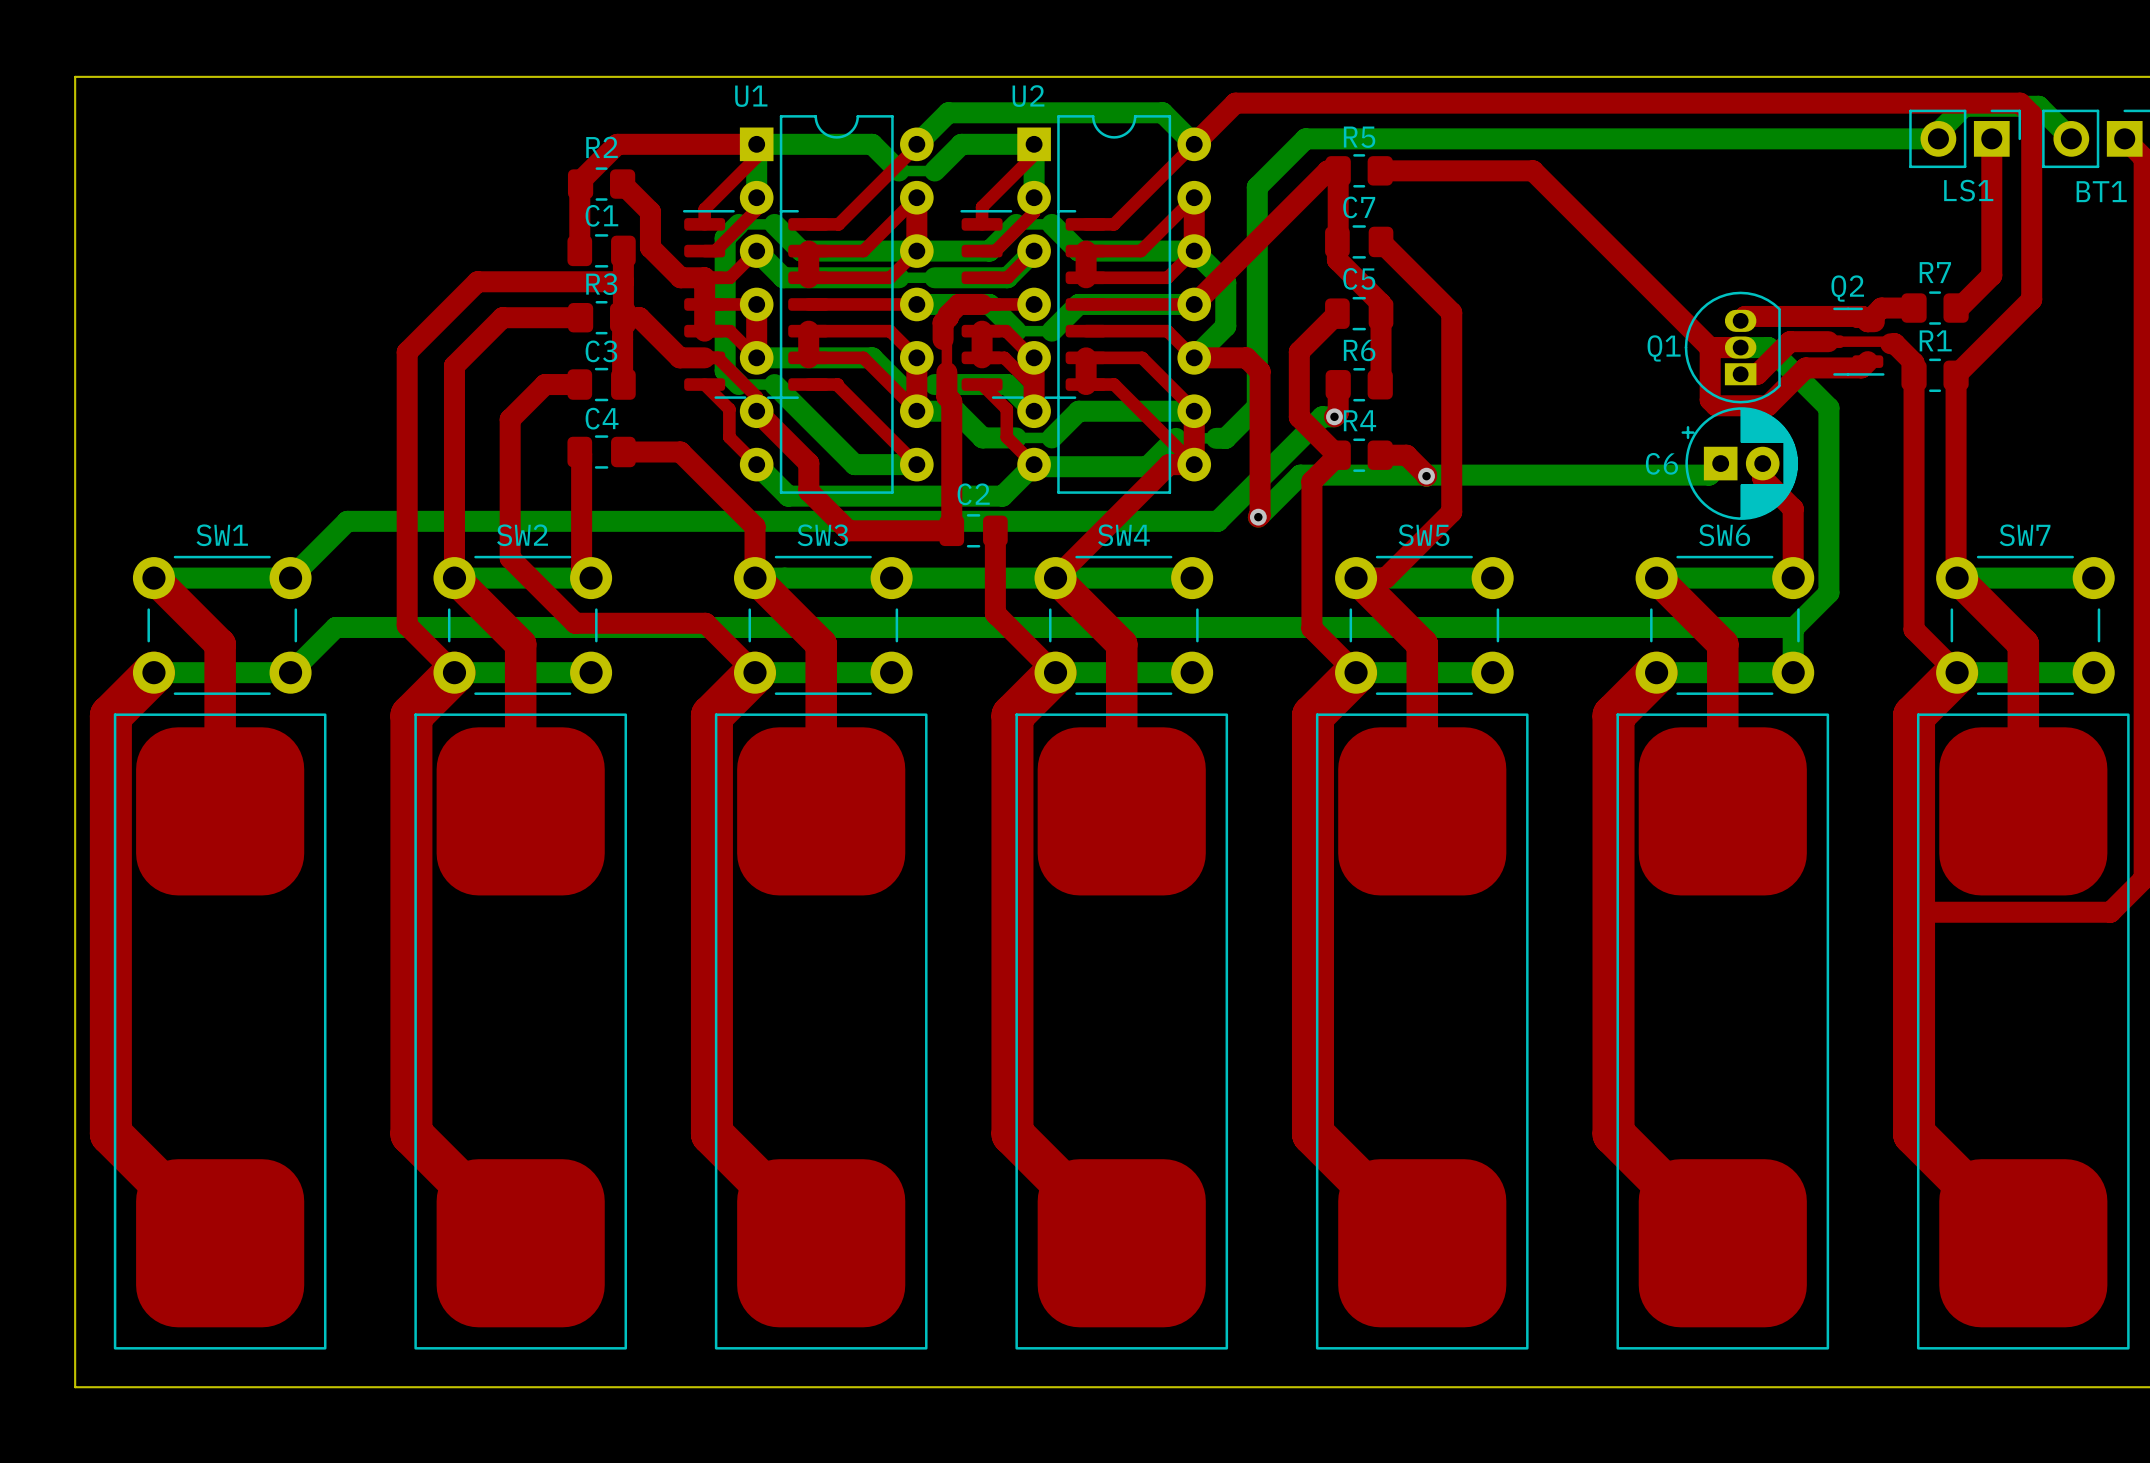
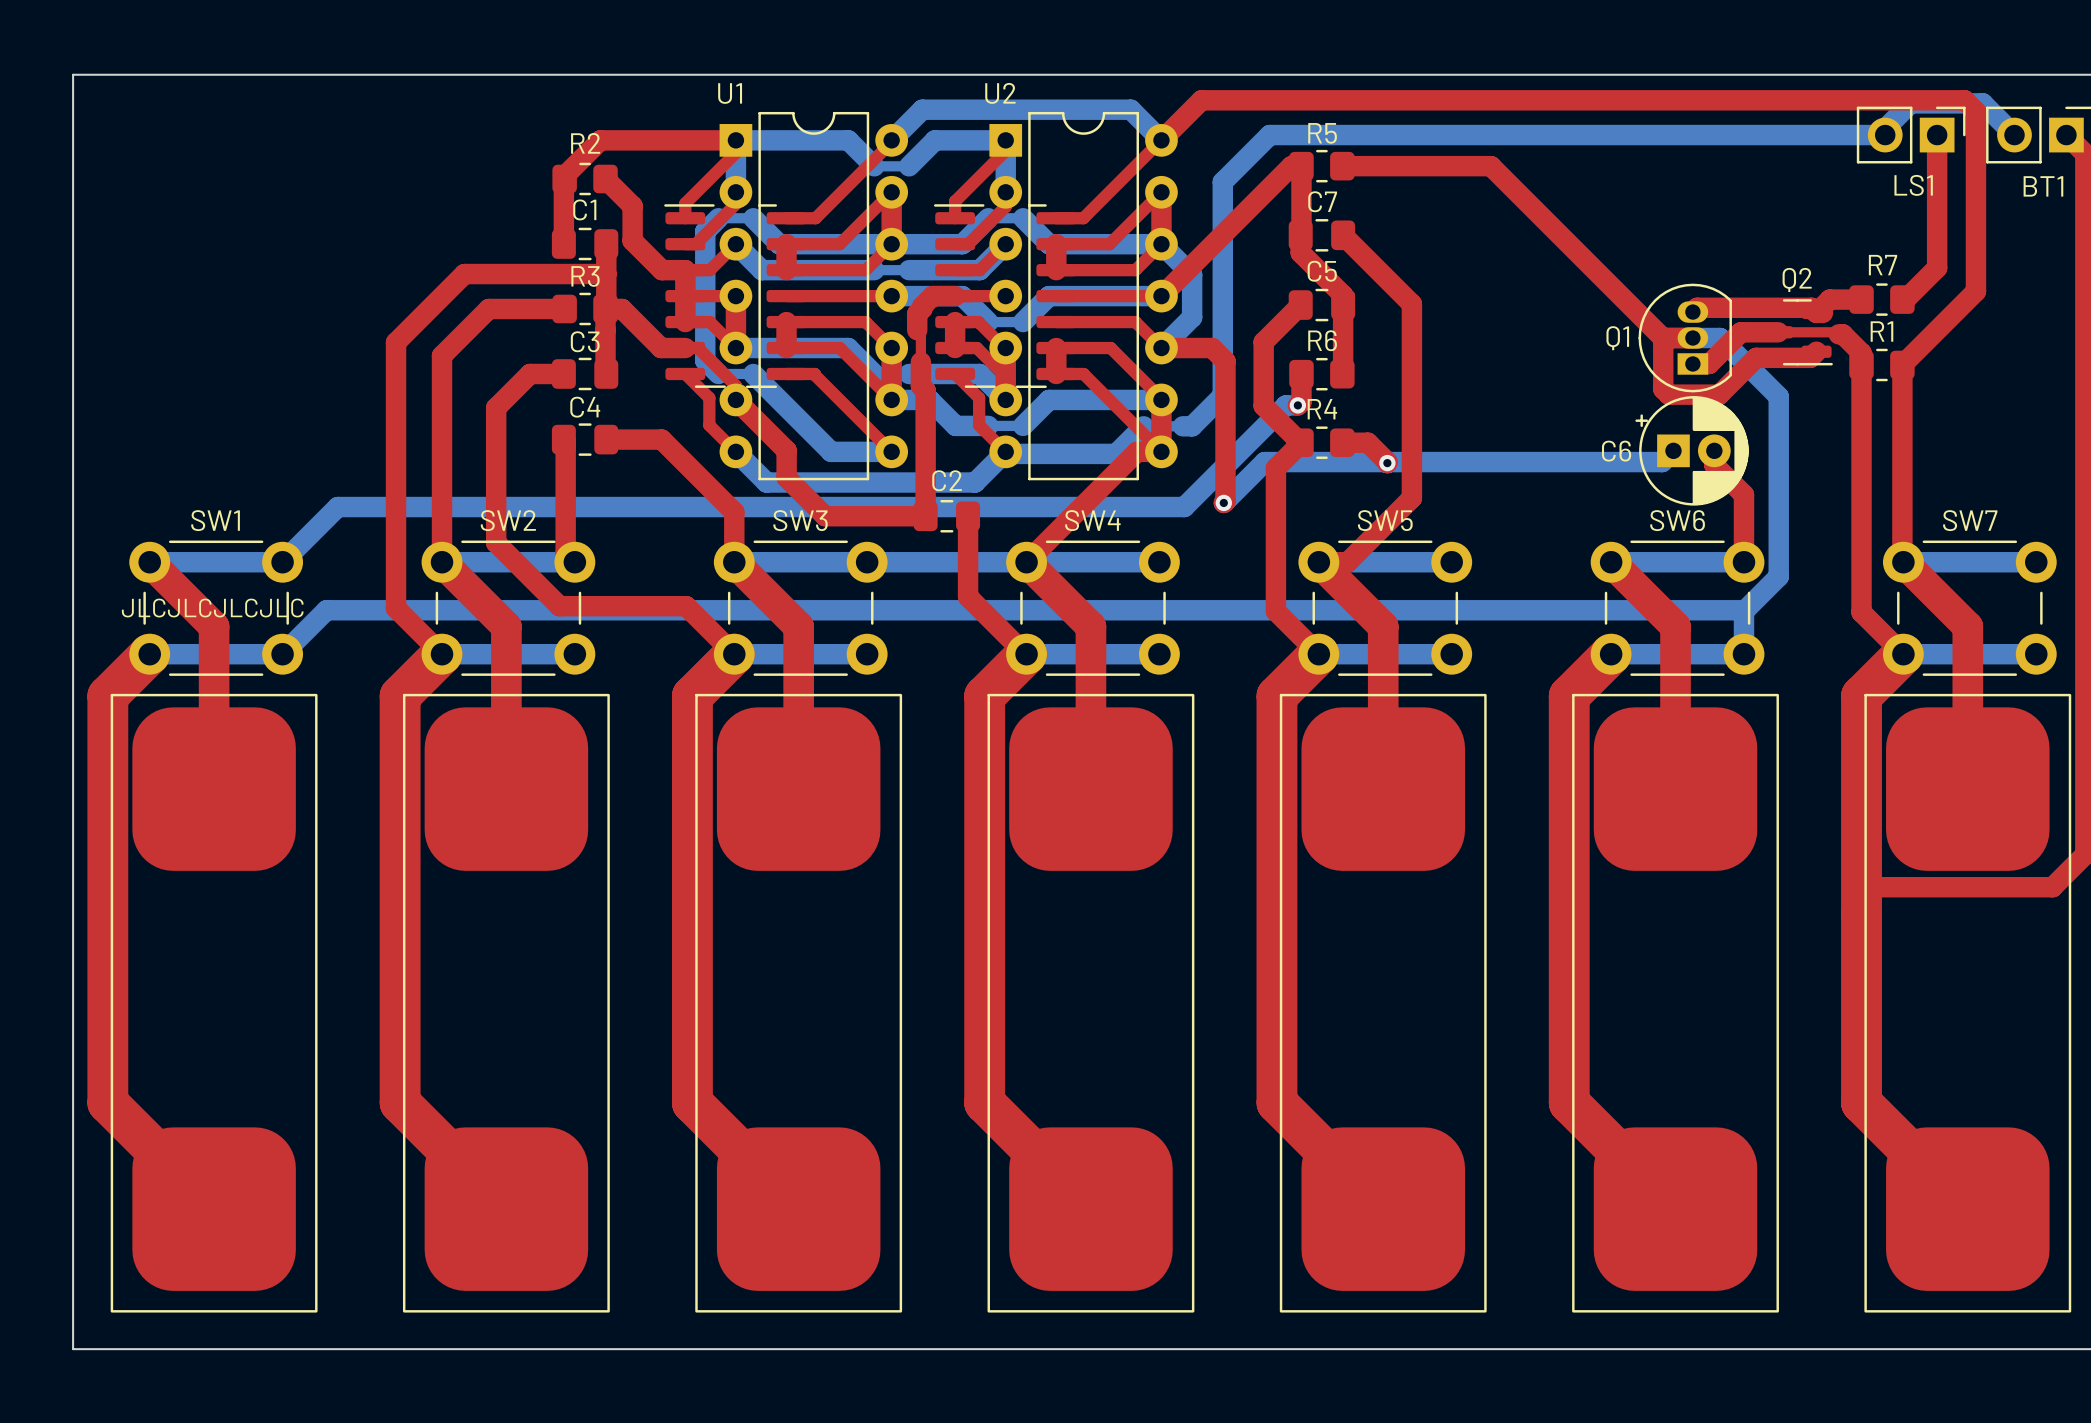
text: none -> JLCJLCJLCJLC (212, 608)

